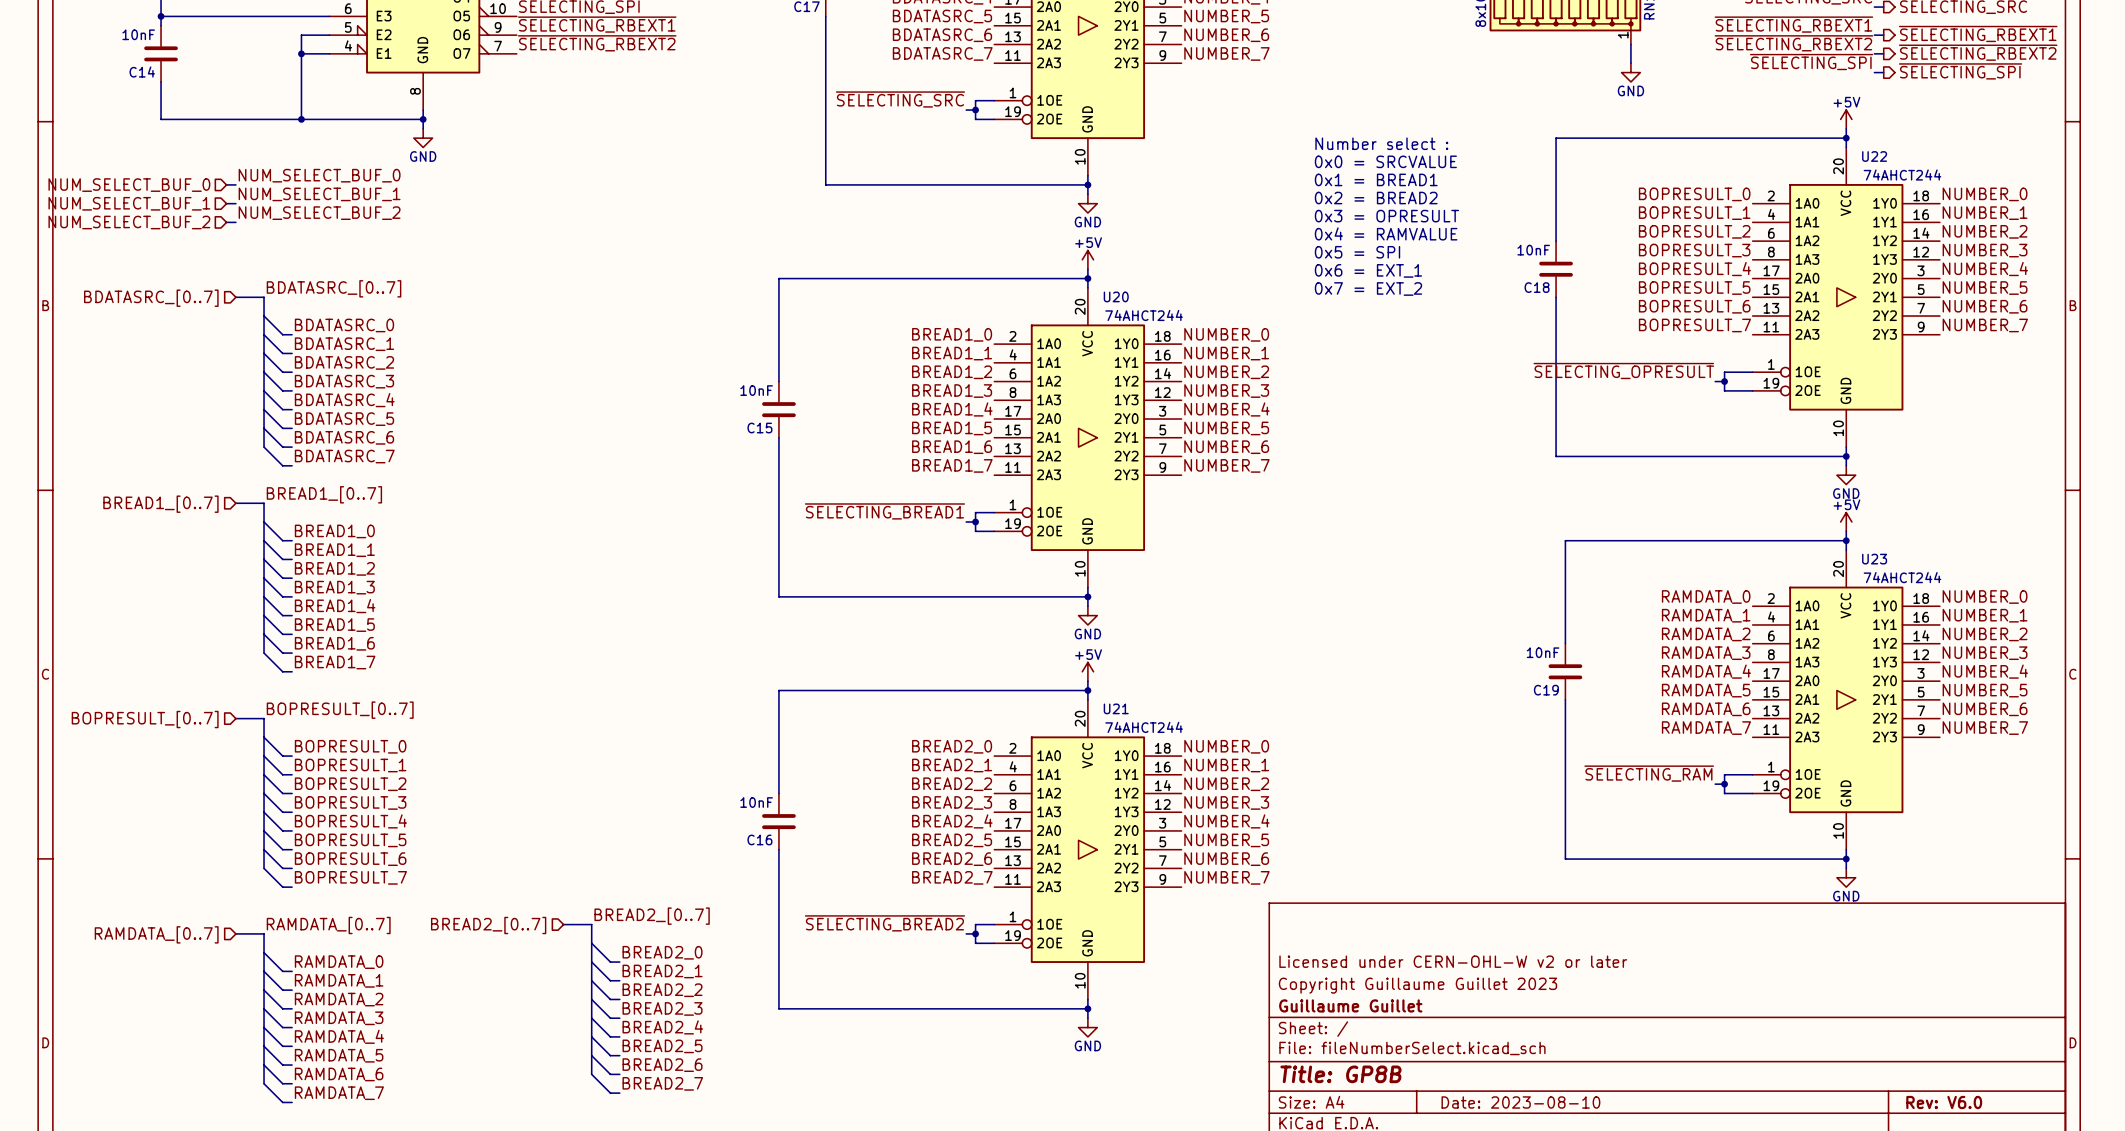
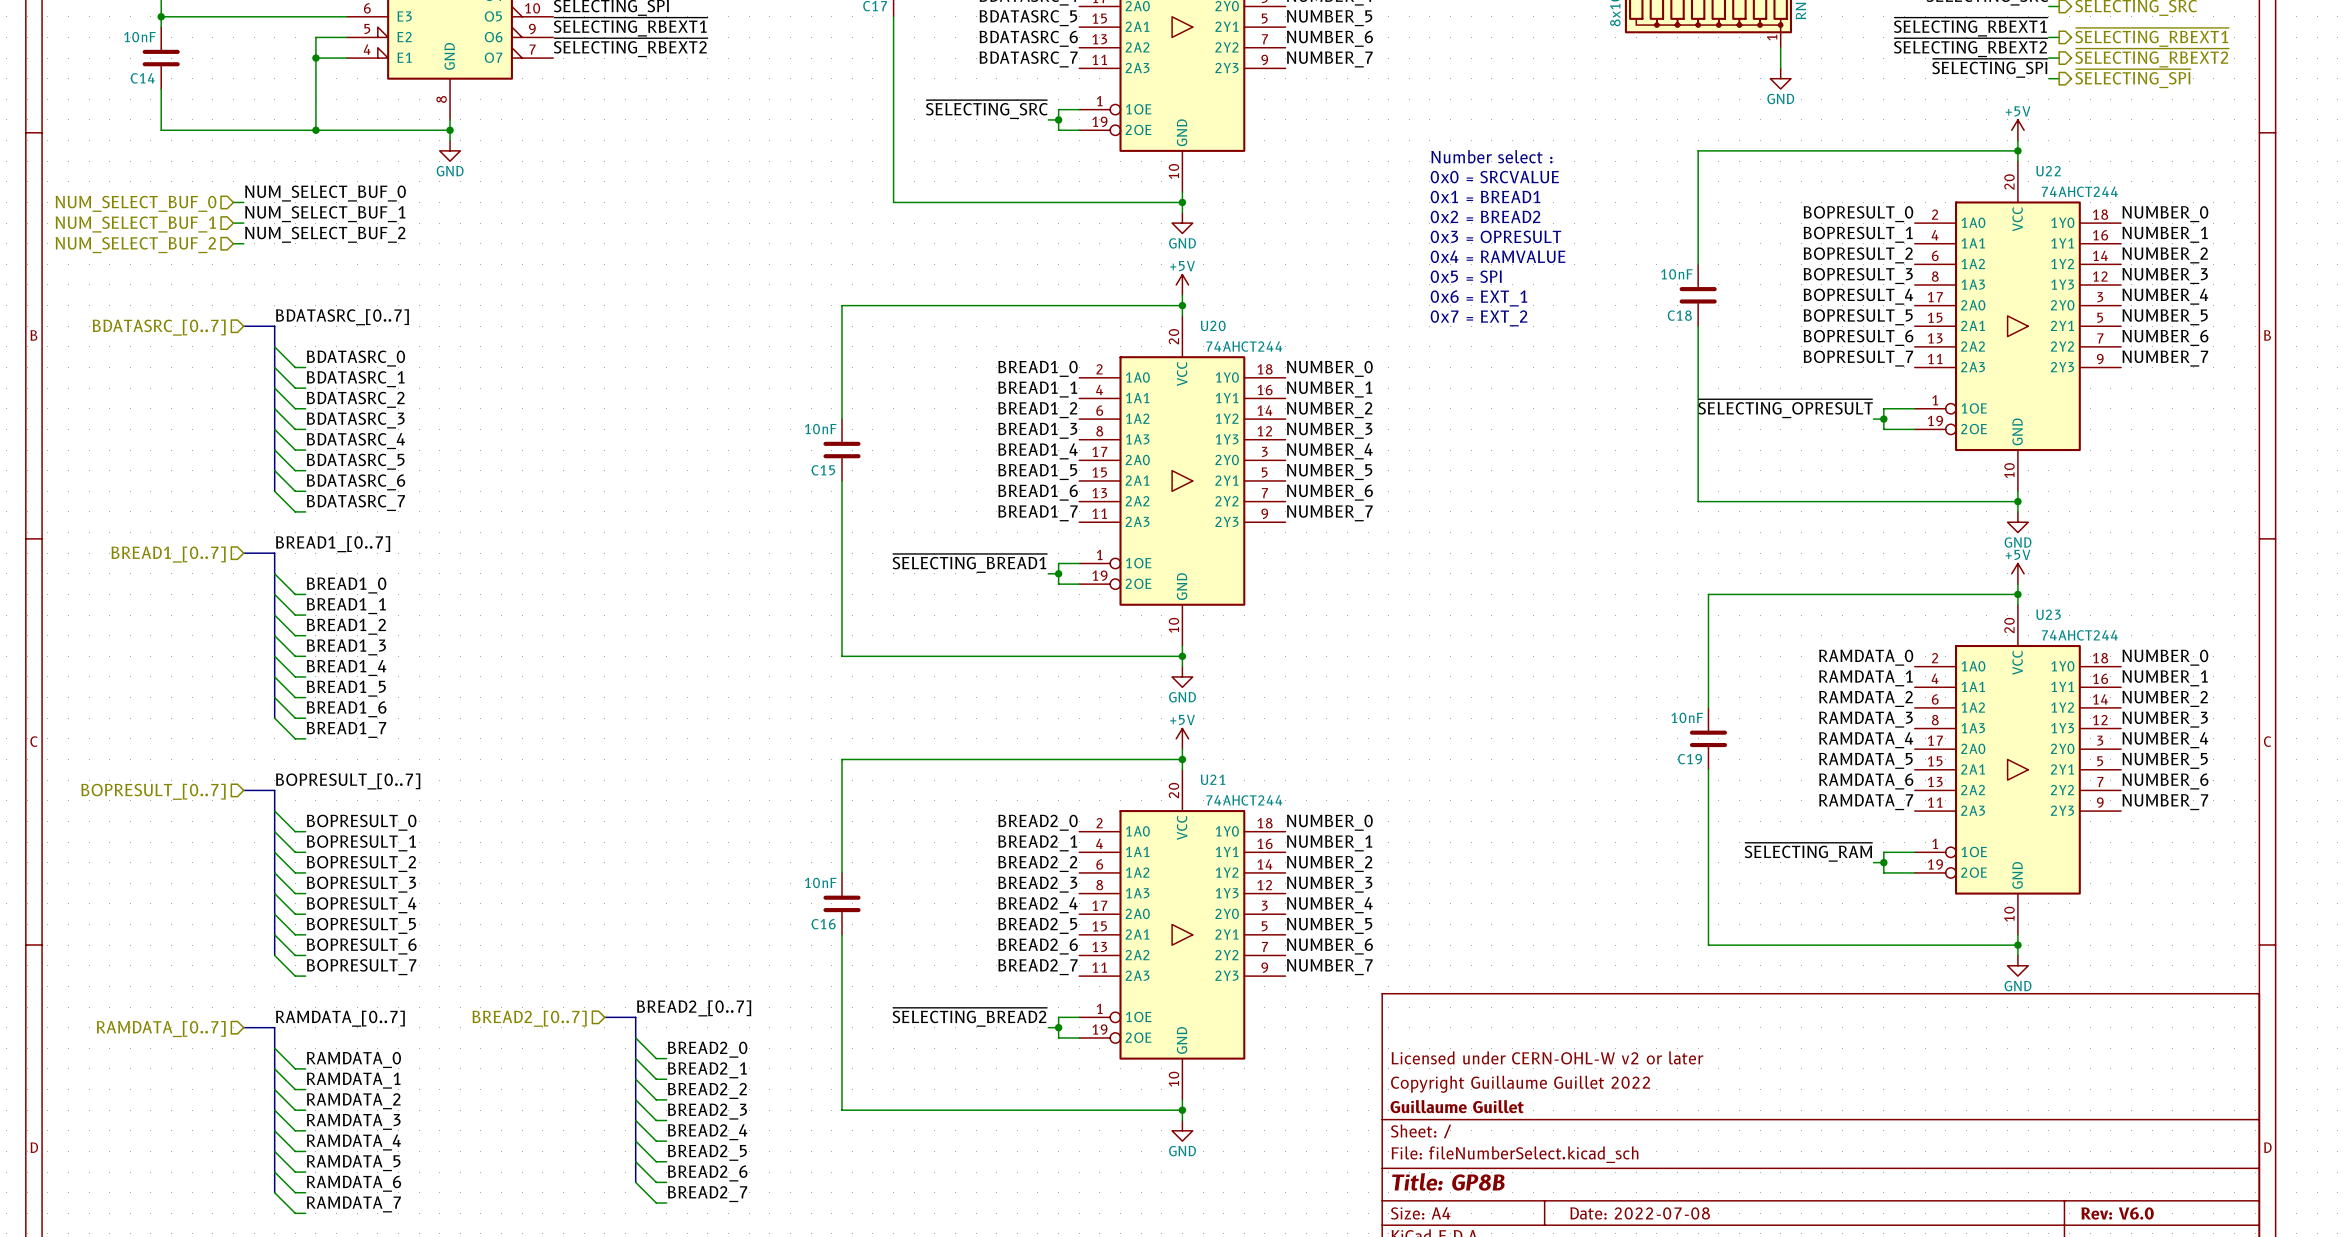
title block: Copyright Guillaume Guillet 2023 (1417, 985) -> Copyright Guillaume Guillet 2022 (1520, 1084)
title block: Date: 2023-08-10 (1520, 1102) -> Date: 2022-07-08 (1640, 1213)

